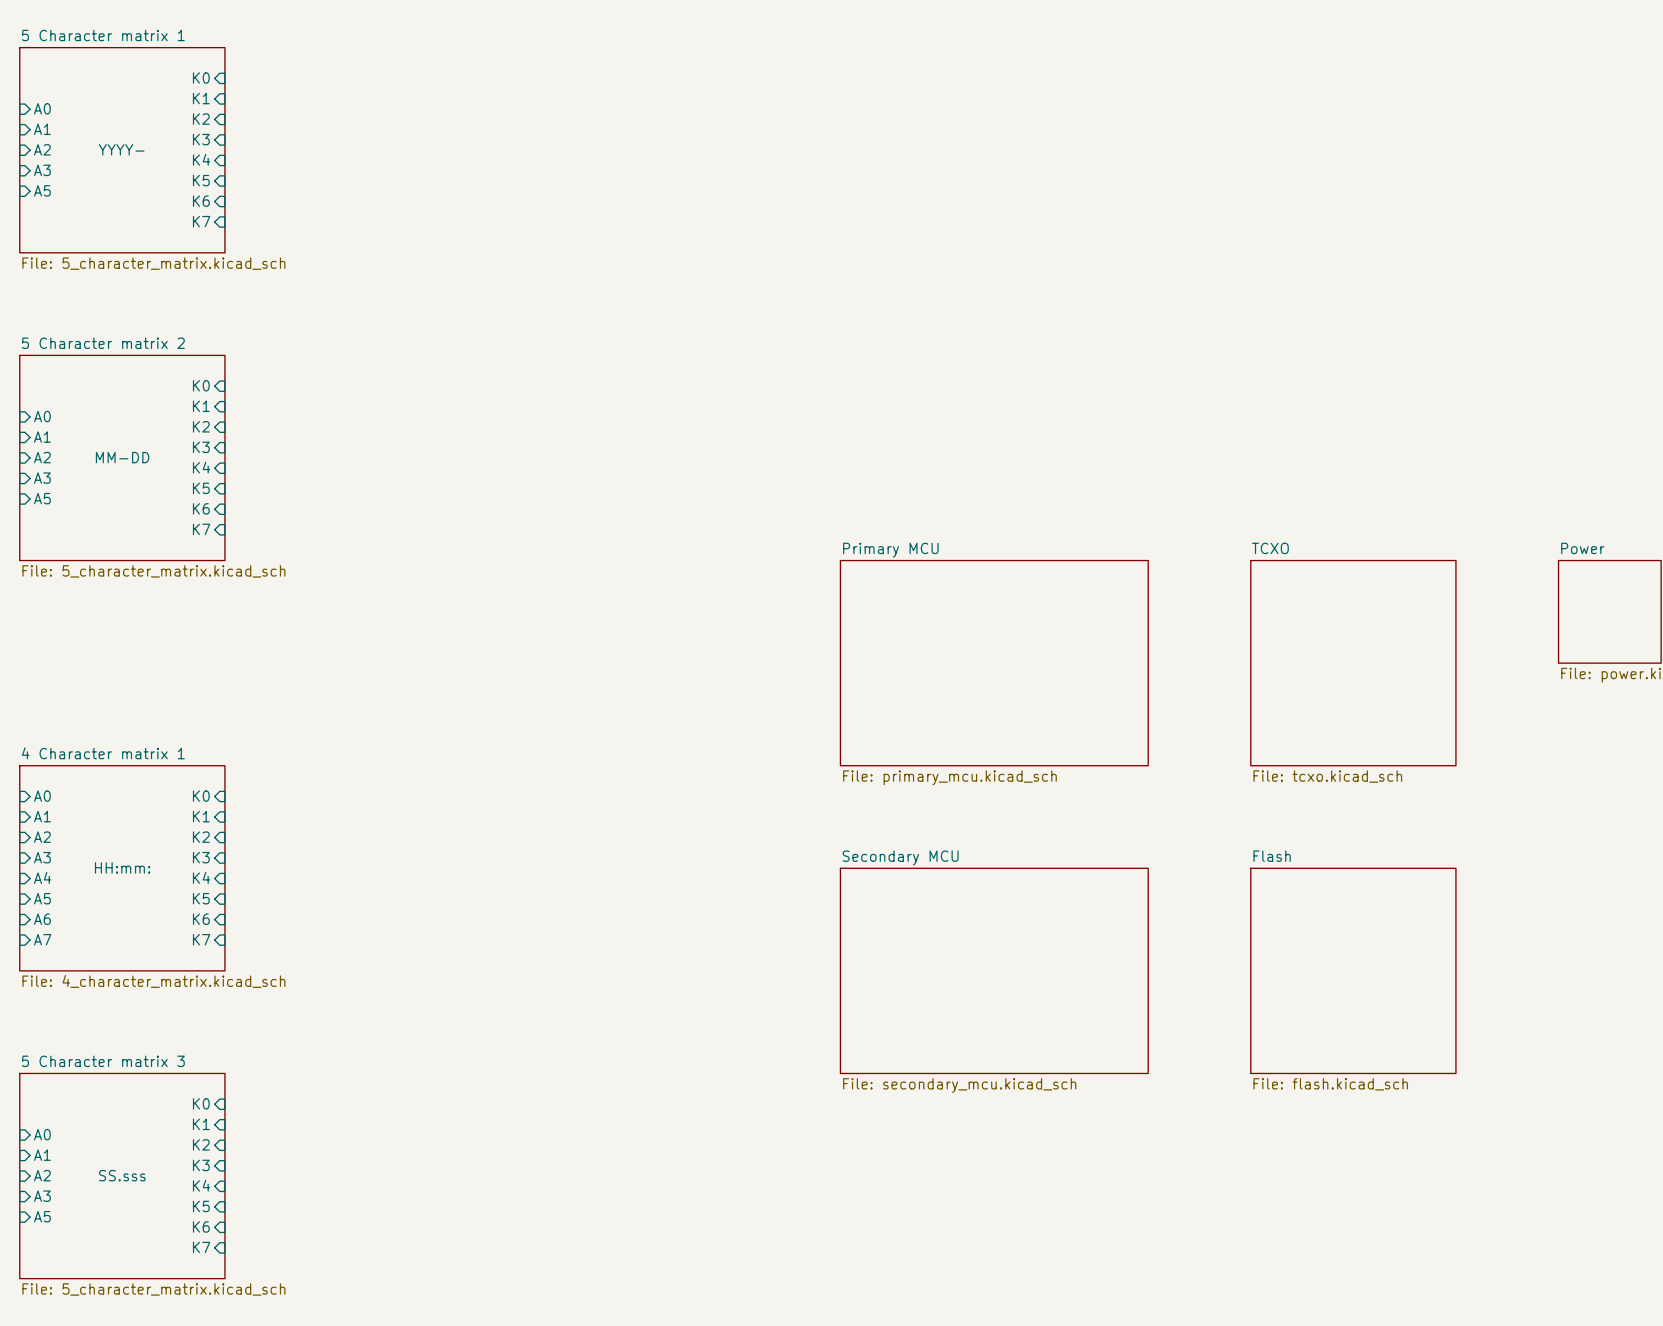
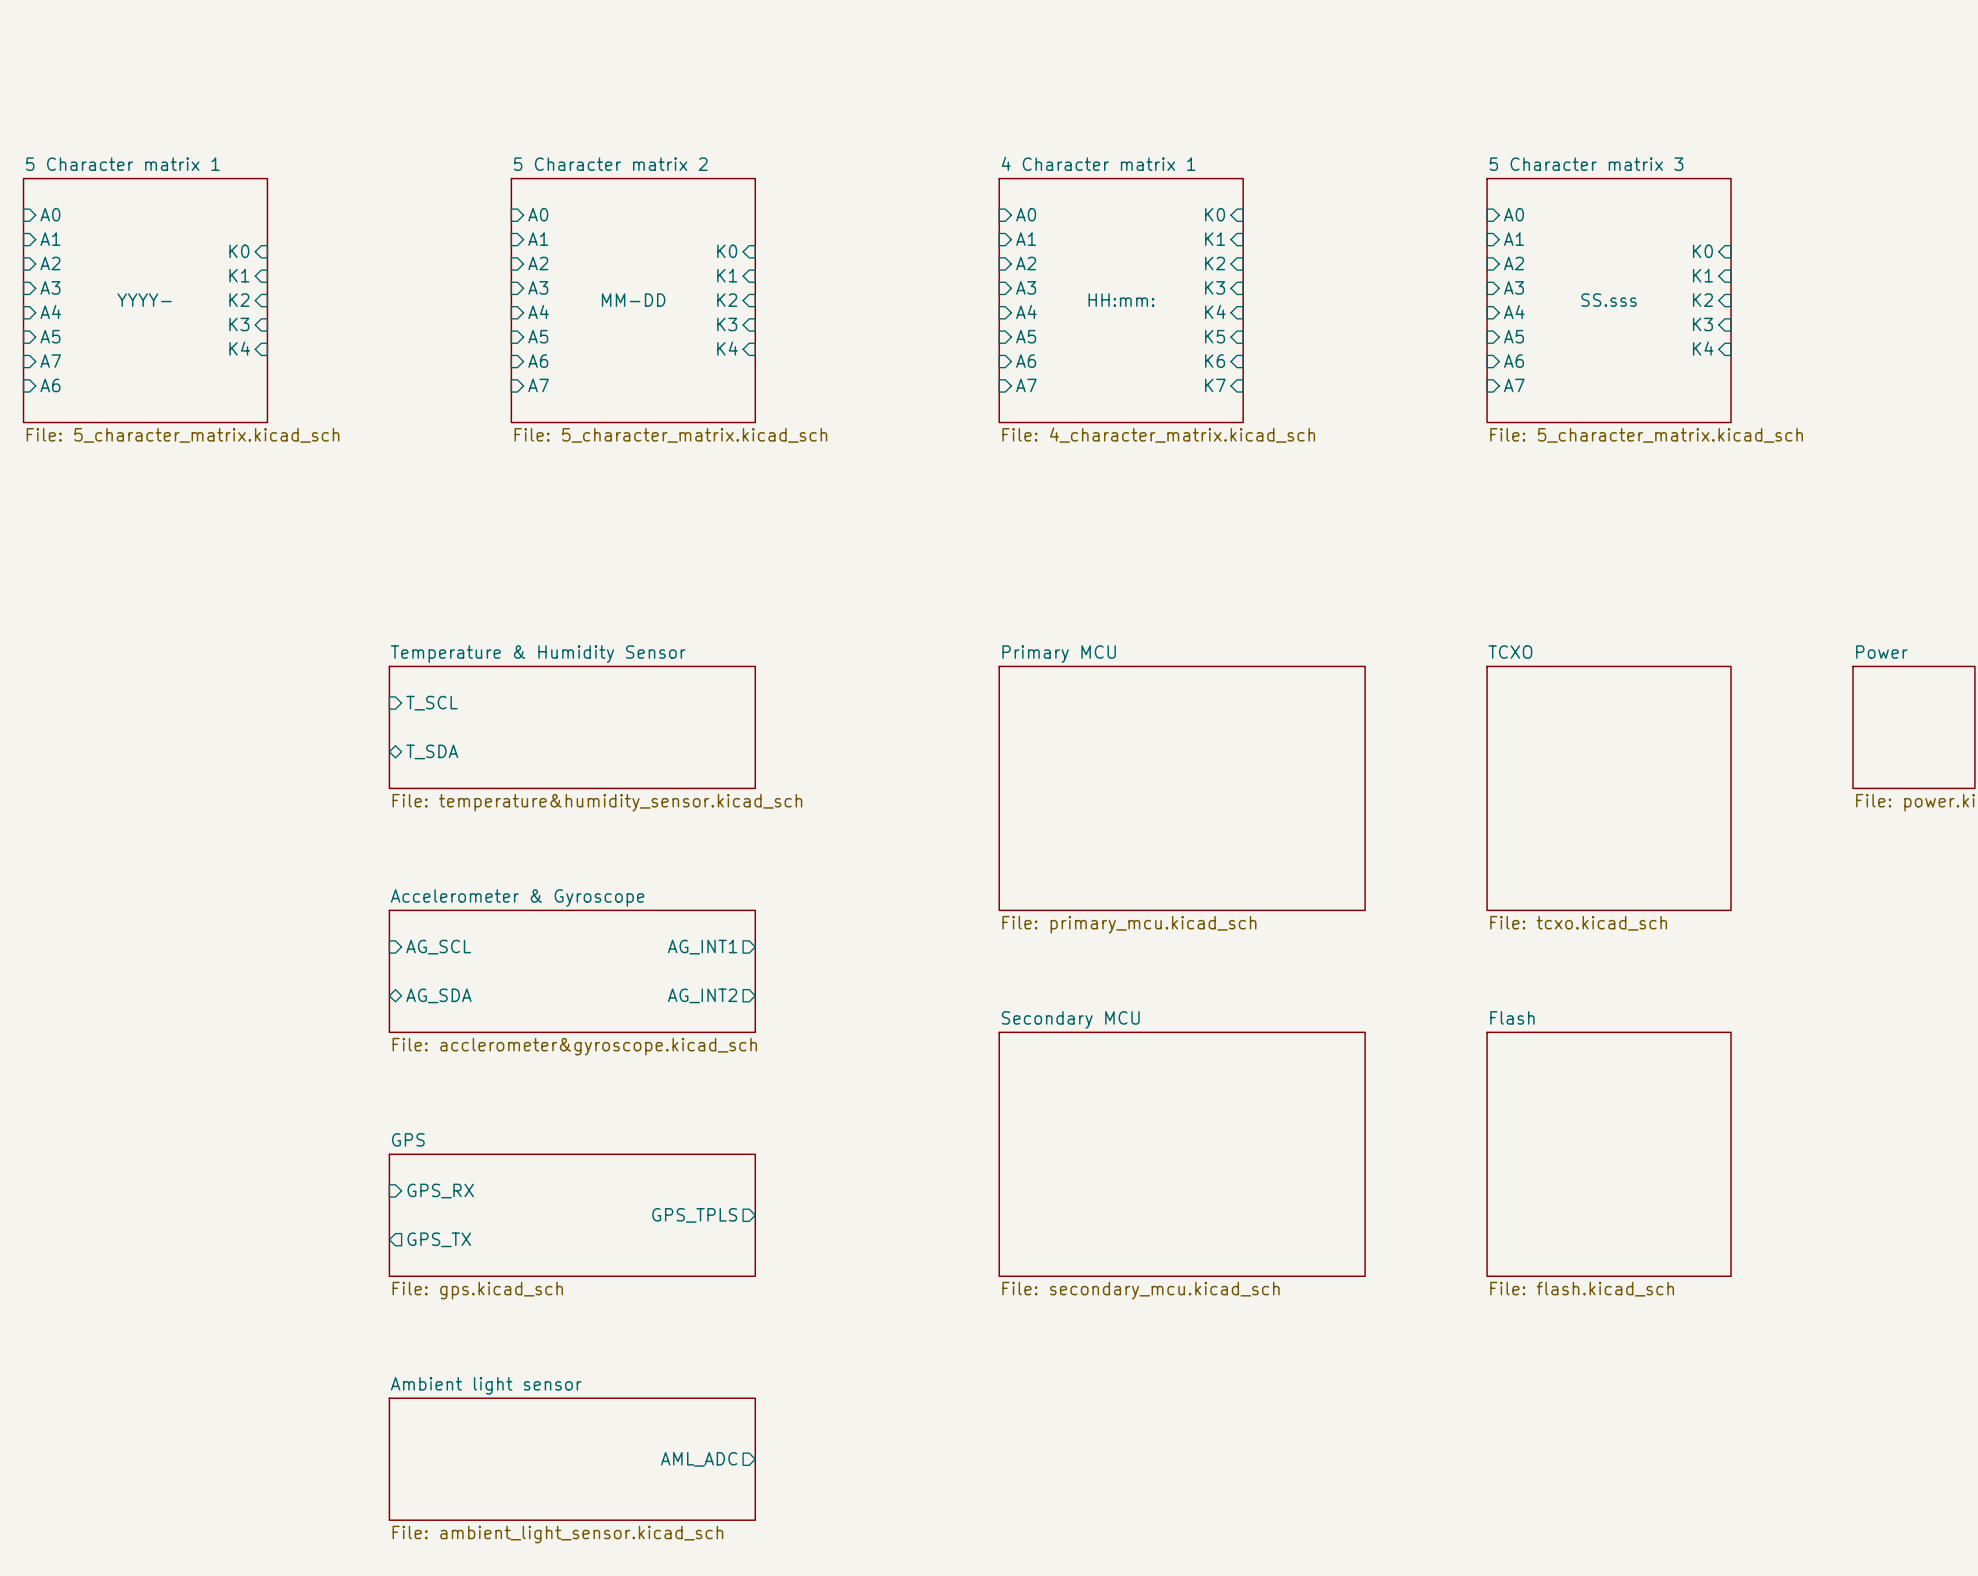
sheet pin: K0 (201, 78) -> none
sheet pin: K1 (201, 98) -> none
sheet pin position: A0 (42, 108) -> A0 (50, 214)
sheet pin: K2 (201, 119) -> none
sheet pin position: A1 (42, 129) -> A1 (50, 239)
sheet pin: K3 (201, 139) -> none
sheet pin position: A2 (42, 149) -> A2 (50, 263)
sheet 5 Character matrix 1 position: (122, 150) -> (145, 300)
sheet pin: K4 (201, 159) -> none
sheet pin position: A3 (42, 170) -> A3 (50, 287)
sheet pin: K5 (201, 180) -> none
sheet pin: none -> A0 (538, 214)
sheet pin: none -> A0 (1026, 214)
sheet pin: none -> K0 (1215, 214)
sheet pin: none -> A0 (1513, 214)
sheet pin position: A5 (42, 190) -> A5 (50, 336)
sheet pin: K6 (201, 201) -> none
sheet pin: none -> A1 (538, 239)
sheet pin: none -> A1 (1026, 239)
sheet pin: none -> K1 (1215, 239)
sheet pin: none -> A1 (1513, 239)
sheet pin: none -> K0 (239, 251)
sheet pin: none -> K0 (727, 251)
sheet pin: none -> K0 (1702, 251)
sheet pin: K7 (201, 221) -> none
sheet pin: none -> A2 (538, 263)
sheet pin: none -> A2 (1026, 263)
sheet pin: none -> K2 (1215, 263)
sheet pin: none -> A2 (1513, 263)
sheet pin: none -> K1 (239, 275)
sheet pin: none -> K1 (727, 275)
sheet pin: none -> K1 (1702, 275)
sheet pin: none -> A3 (538, 287)
sheet pin: none -> A3 (1026, 287)
sheet pin: none -> K3 (1215, 287)
sheet pin: none -> A3 (1513, 287)
sheet pin: none -> K2 (239, 300)
sheet pin: none -> K2 (727, 300)
sheet pin: none -> K2 (1702, 300)
sheet pin: none -> A4 (50, 312)
sheet pin: none -> A4 (538, 312)
sheet pin: none -> A4 (1026, 312)
sheet pin: none -> K4 (1215, 312)
sheet pin: none -> A4 (1514, 312)
sheet pin: none -> K3 (239, 324)
sheet pin: none -> K3 (727, 324)
sheet pin: none -> K3 (1702, 324)
sheet pin: none -> A5 (538, 336)
sheet pin: none -> A5 (1026, 336)
sheet pin: none -> K5 (1215, 336)
sheet pin: none -> A5 (1513, 336)
sheet pin: none -> K4 (239, 348)
sheet pin: none -> K4 (727, 348)
sheet pin: none -> K4 (1703, 348)
sheet pin: none -> A7 (50, 361)
sheet pin: none -> A6 (538, 361)
sheet pin: none -> A6 (1026, 361)
sheet pin: none -> K6 (1215, 361)
sheet pin: none -> A6 (1513, 361)
sheet pin: none -> A6 (50, 385)
sheet pin: none -> A7 (538, 385)
sheet pin: none -> A7 (1026, 385)
sheet pin: none -> K7 (1215, 385)
sheet pin: none -> A7 (1514, 385)
sheet pin: K0 (201, 385) -> none
sheet pin: K1 (201, 406) -> none
sheet pin: A0 (42, 416) -> none
sheet pin: K2 (201, 426) -> none
sheet pin: A1 (42, 437) -> none
sheet pin: K3 (201, 447) -> none
sheet pin: A2 (42, 457) -> none
sheet 5 Character matrix 2 position: (122, 457) -> (633, 300)
sheet pin: K4 (201, 467) -> none
sheet pin: A3 (42, 478) -> none
sheet pin: K5 (201, 488) -> none
sheet pin: A5 (42, 498) -> none
sheet pin: K6 (201, 508) -> none
sheet pin: K7 (201, 529) -> none
sheet pin: none -> T_SCL (431, 703)
sheet Temperature & Humidity Sensor: none -> File: temperature&humidity_sensor.kicad_sch (572, 727)
sheet pin: none -> T_SDA (432, 751)
sheet pin: A0 (42, 796) -> none
sheet pin: K0 (201, 796) -> none
sheet pin: none -> AG_SCL (438, 947)
sheet pin: none -> AG_INT1 (702, 947)
sheet pin: A1 (42, 816) -> none
sheet pin: K1 (201, 816) -> none
sheet Accelerometer & Gyroscope: none -> File: acclerometer&gyroscope.kicad_sch (572, 971)
sheet pin: A2 (42, 837) -> none
sheet pin: K2 (201, 837) -> none
sheet pin: none -> AG_SDA (438, 995)
sheet pin: none -> AG_INT2 (702, 995)
sheet pin: A3 (42, 857) -> none
sheet pin: K3 (201, 857) -> none
sheet 4 Character matrix 1 position: (122, 868) -> (1121, 300)
sheet pin: A4 (42, 877) -> none
sheet pin: K4 (201, 877) -> none
sheet pin: A5 (42, 898) -> none
sheet pin: K5 (201, 898) -> none
sheet pin: A6 (42, 919) -> none
sheet pin: K6 (201, 919) -> none
sheet pin: A7 (42, 939) -> none
sheet pin: K7 (201, 939) -> none
sheet pin: none -> GPS_RX (440, 1191)
sheet GPS: none -> File: gps.kicad_sch (572, 1215)
sheet pin: none -> GPS_TPLS (694, 1215)
sheet pin: none -> GPS_TX (439, 1239)
sheet pin: K0 (201, 1103) -> none
sheet pin: K1 (201, 1124) -> none
sheet pin: A0 (42, 1134) -> none
sheet pin: K2 (201, 1144) -> none
sheet pin: A1 (42, 1155) -> none
sheet pin: K3 (201, 1165) -> none
sheet pin: A2 (42, 1175) -> none
sheet 5 Character matrix 3 position: (122, 1176) -> (1609, 300)
sheet pin: K4 (201, 1185) -> none
sheet pin: A3 (42, 1196) -> none
sheet pin: K5 (201, 1206) -> none
sheet pin: A5 (42, 1216) -> none
sheet pin: K6 (201, 1226) -> none
sheet Ambient light sensor: none -> File: ambient_light_sensor.kicad_sch (572, 1459)
sheet pin: none -> AML_ADC (699, 1459)
sheet pin: K7 (201, 1247) -> none

